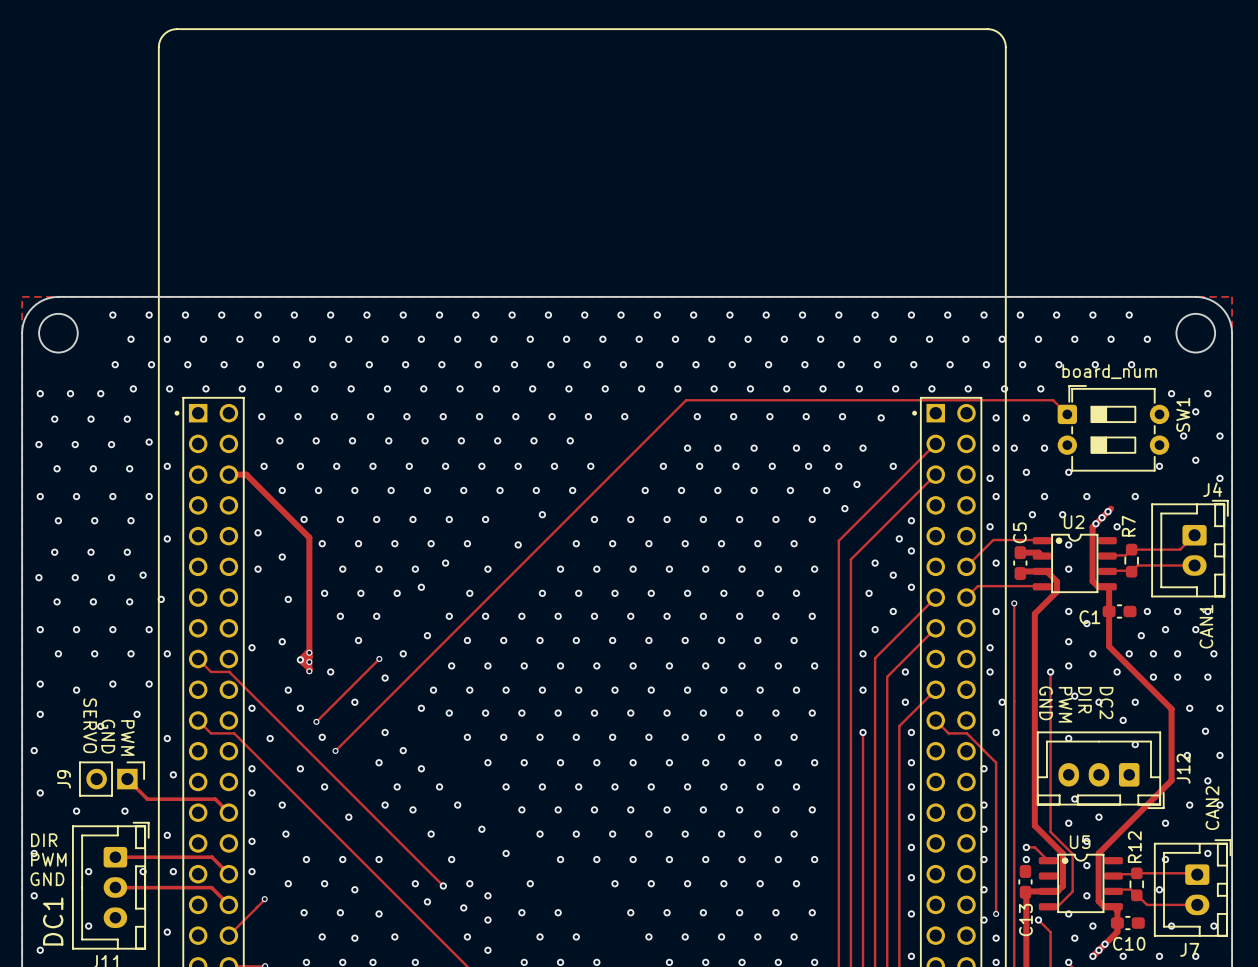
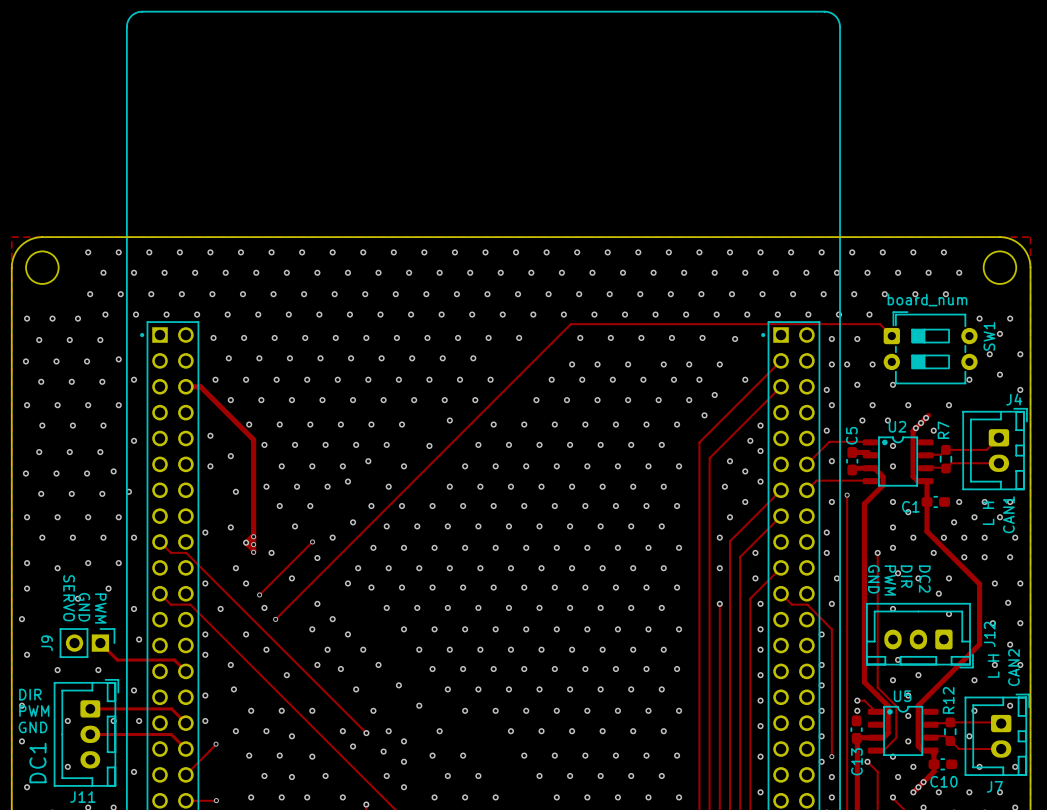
text: none -> L H (988, 513)
text: none -> L H (993, 666)

